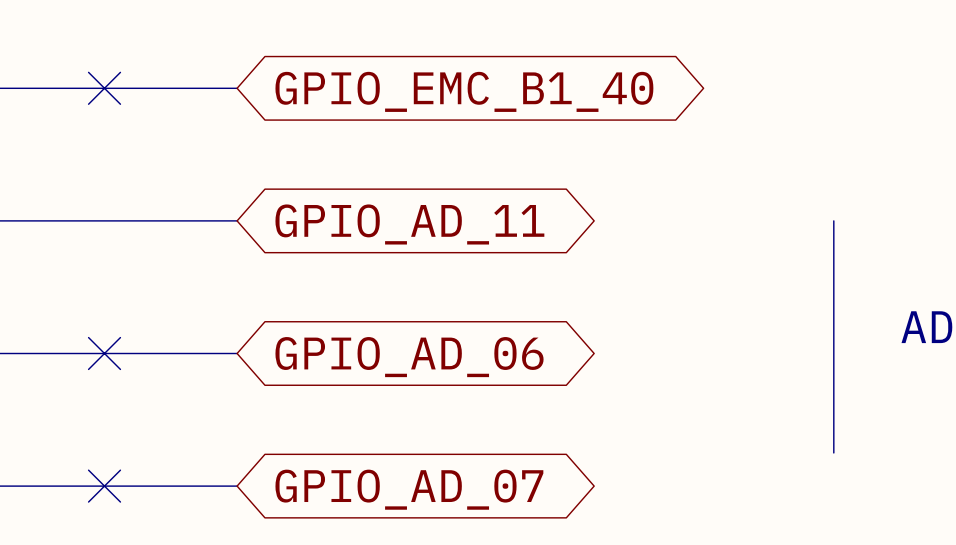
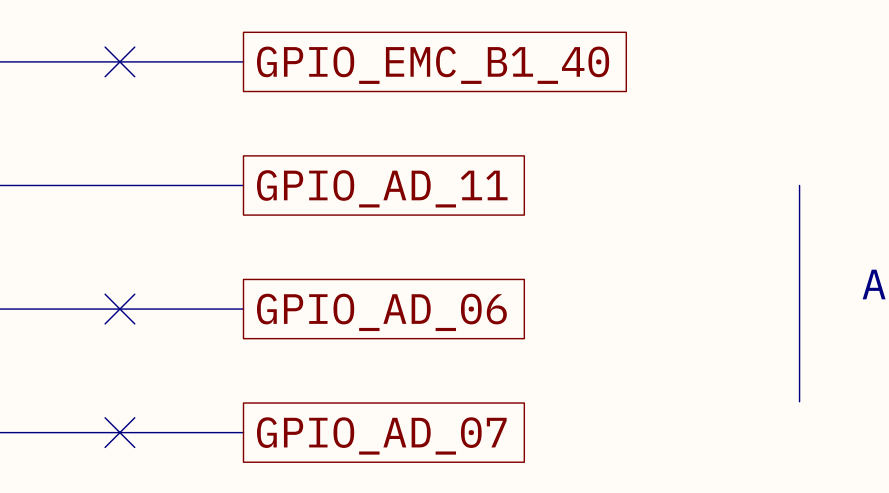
global label shape: bidirectional (464, 91) -> passive (433, 65)
global label shape: bidirectional (409, 224) -> passive (382, 188)
global label shape: bidirectional (409, 357) -> passive (381, 312)
global label shape: bidirectional (409, 489) -> passive (381, 435)

